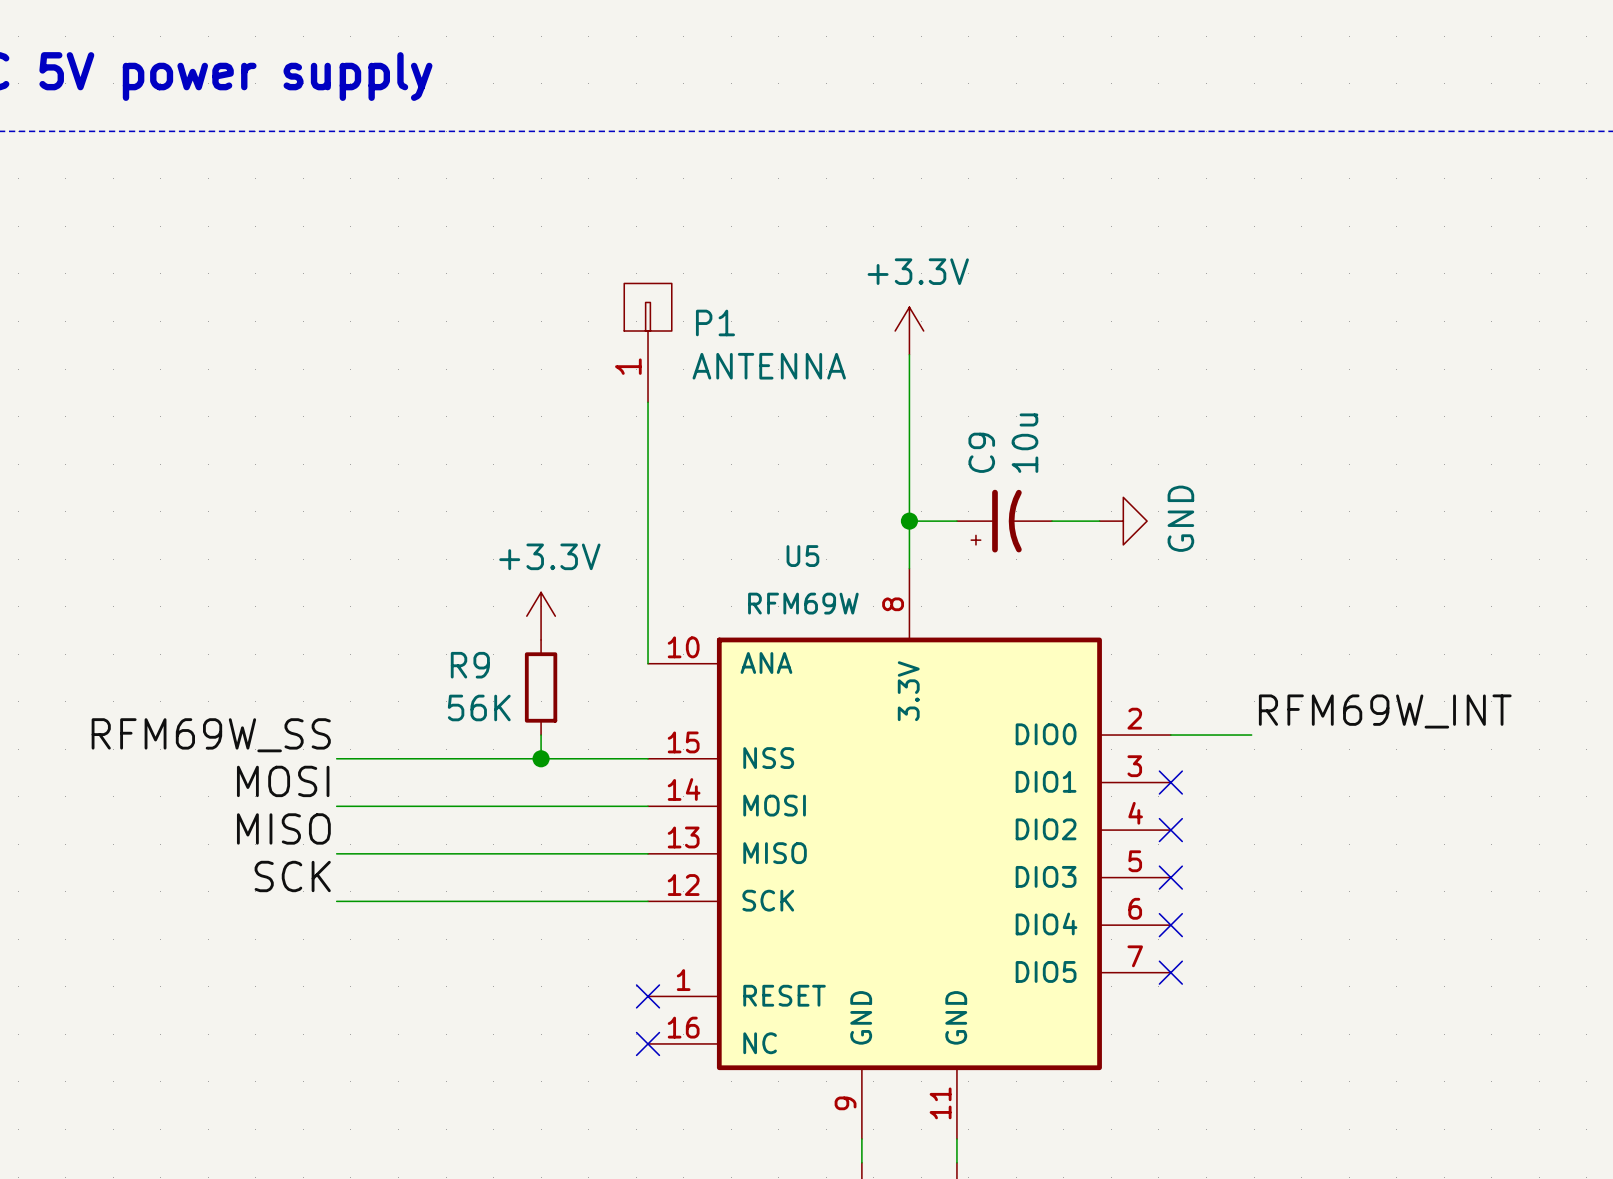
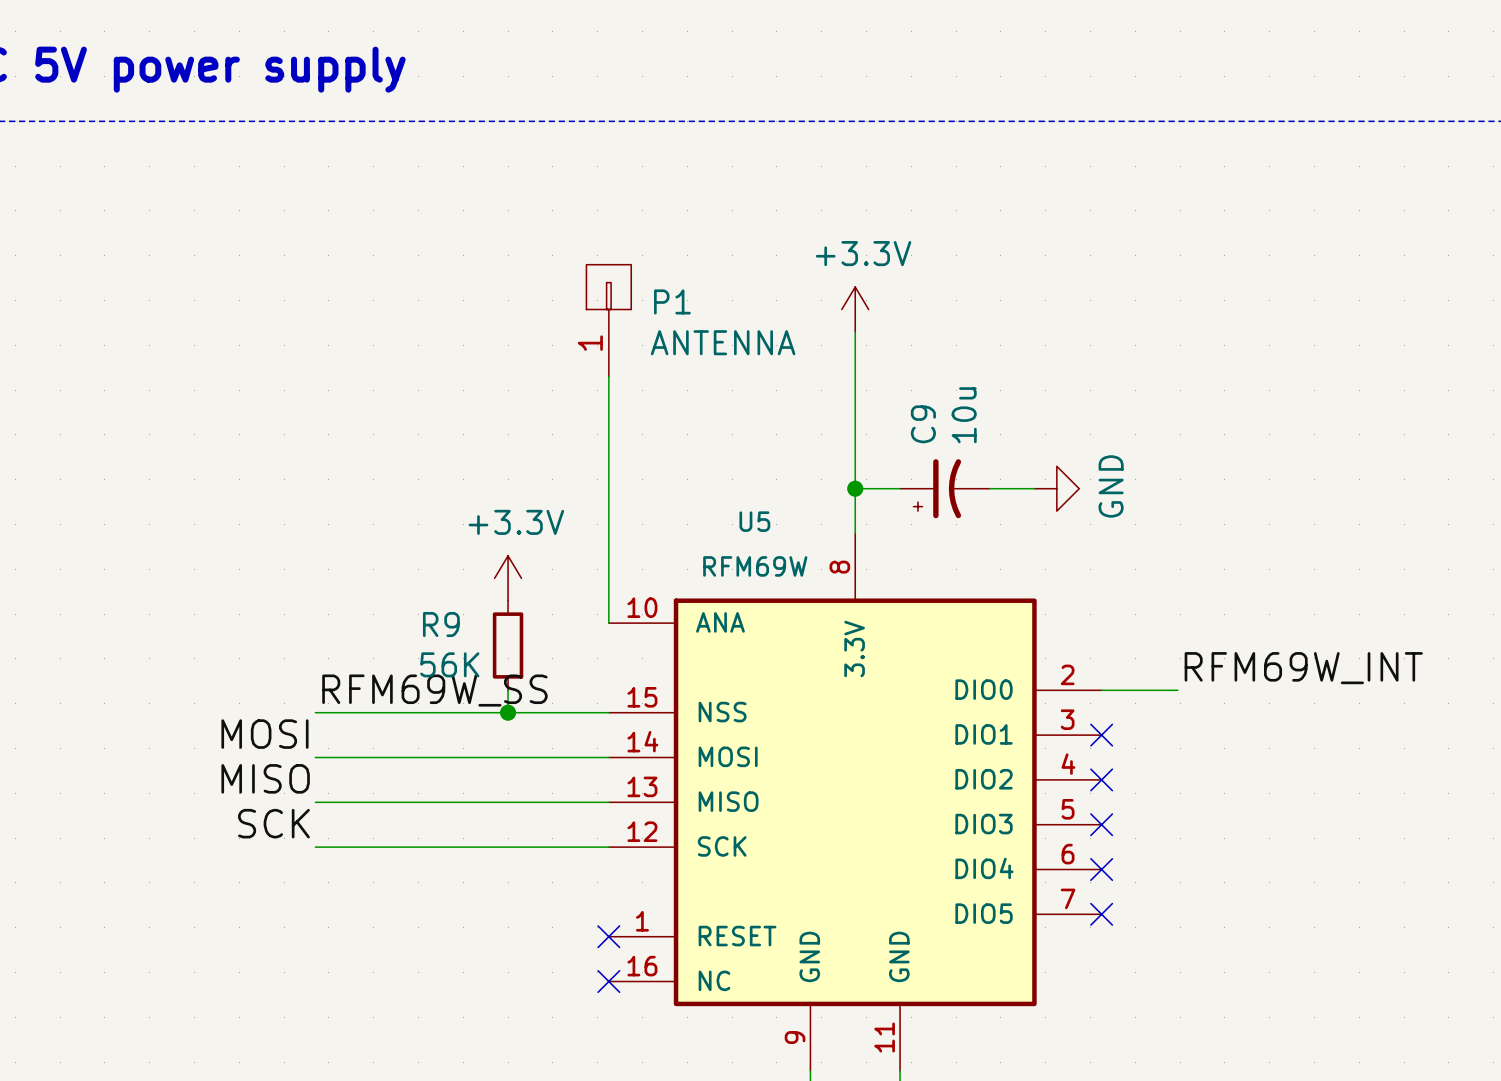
label position: RFM69W_SS (211, 735) -> RFM69W_SS (434, 690)

